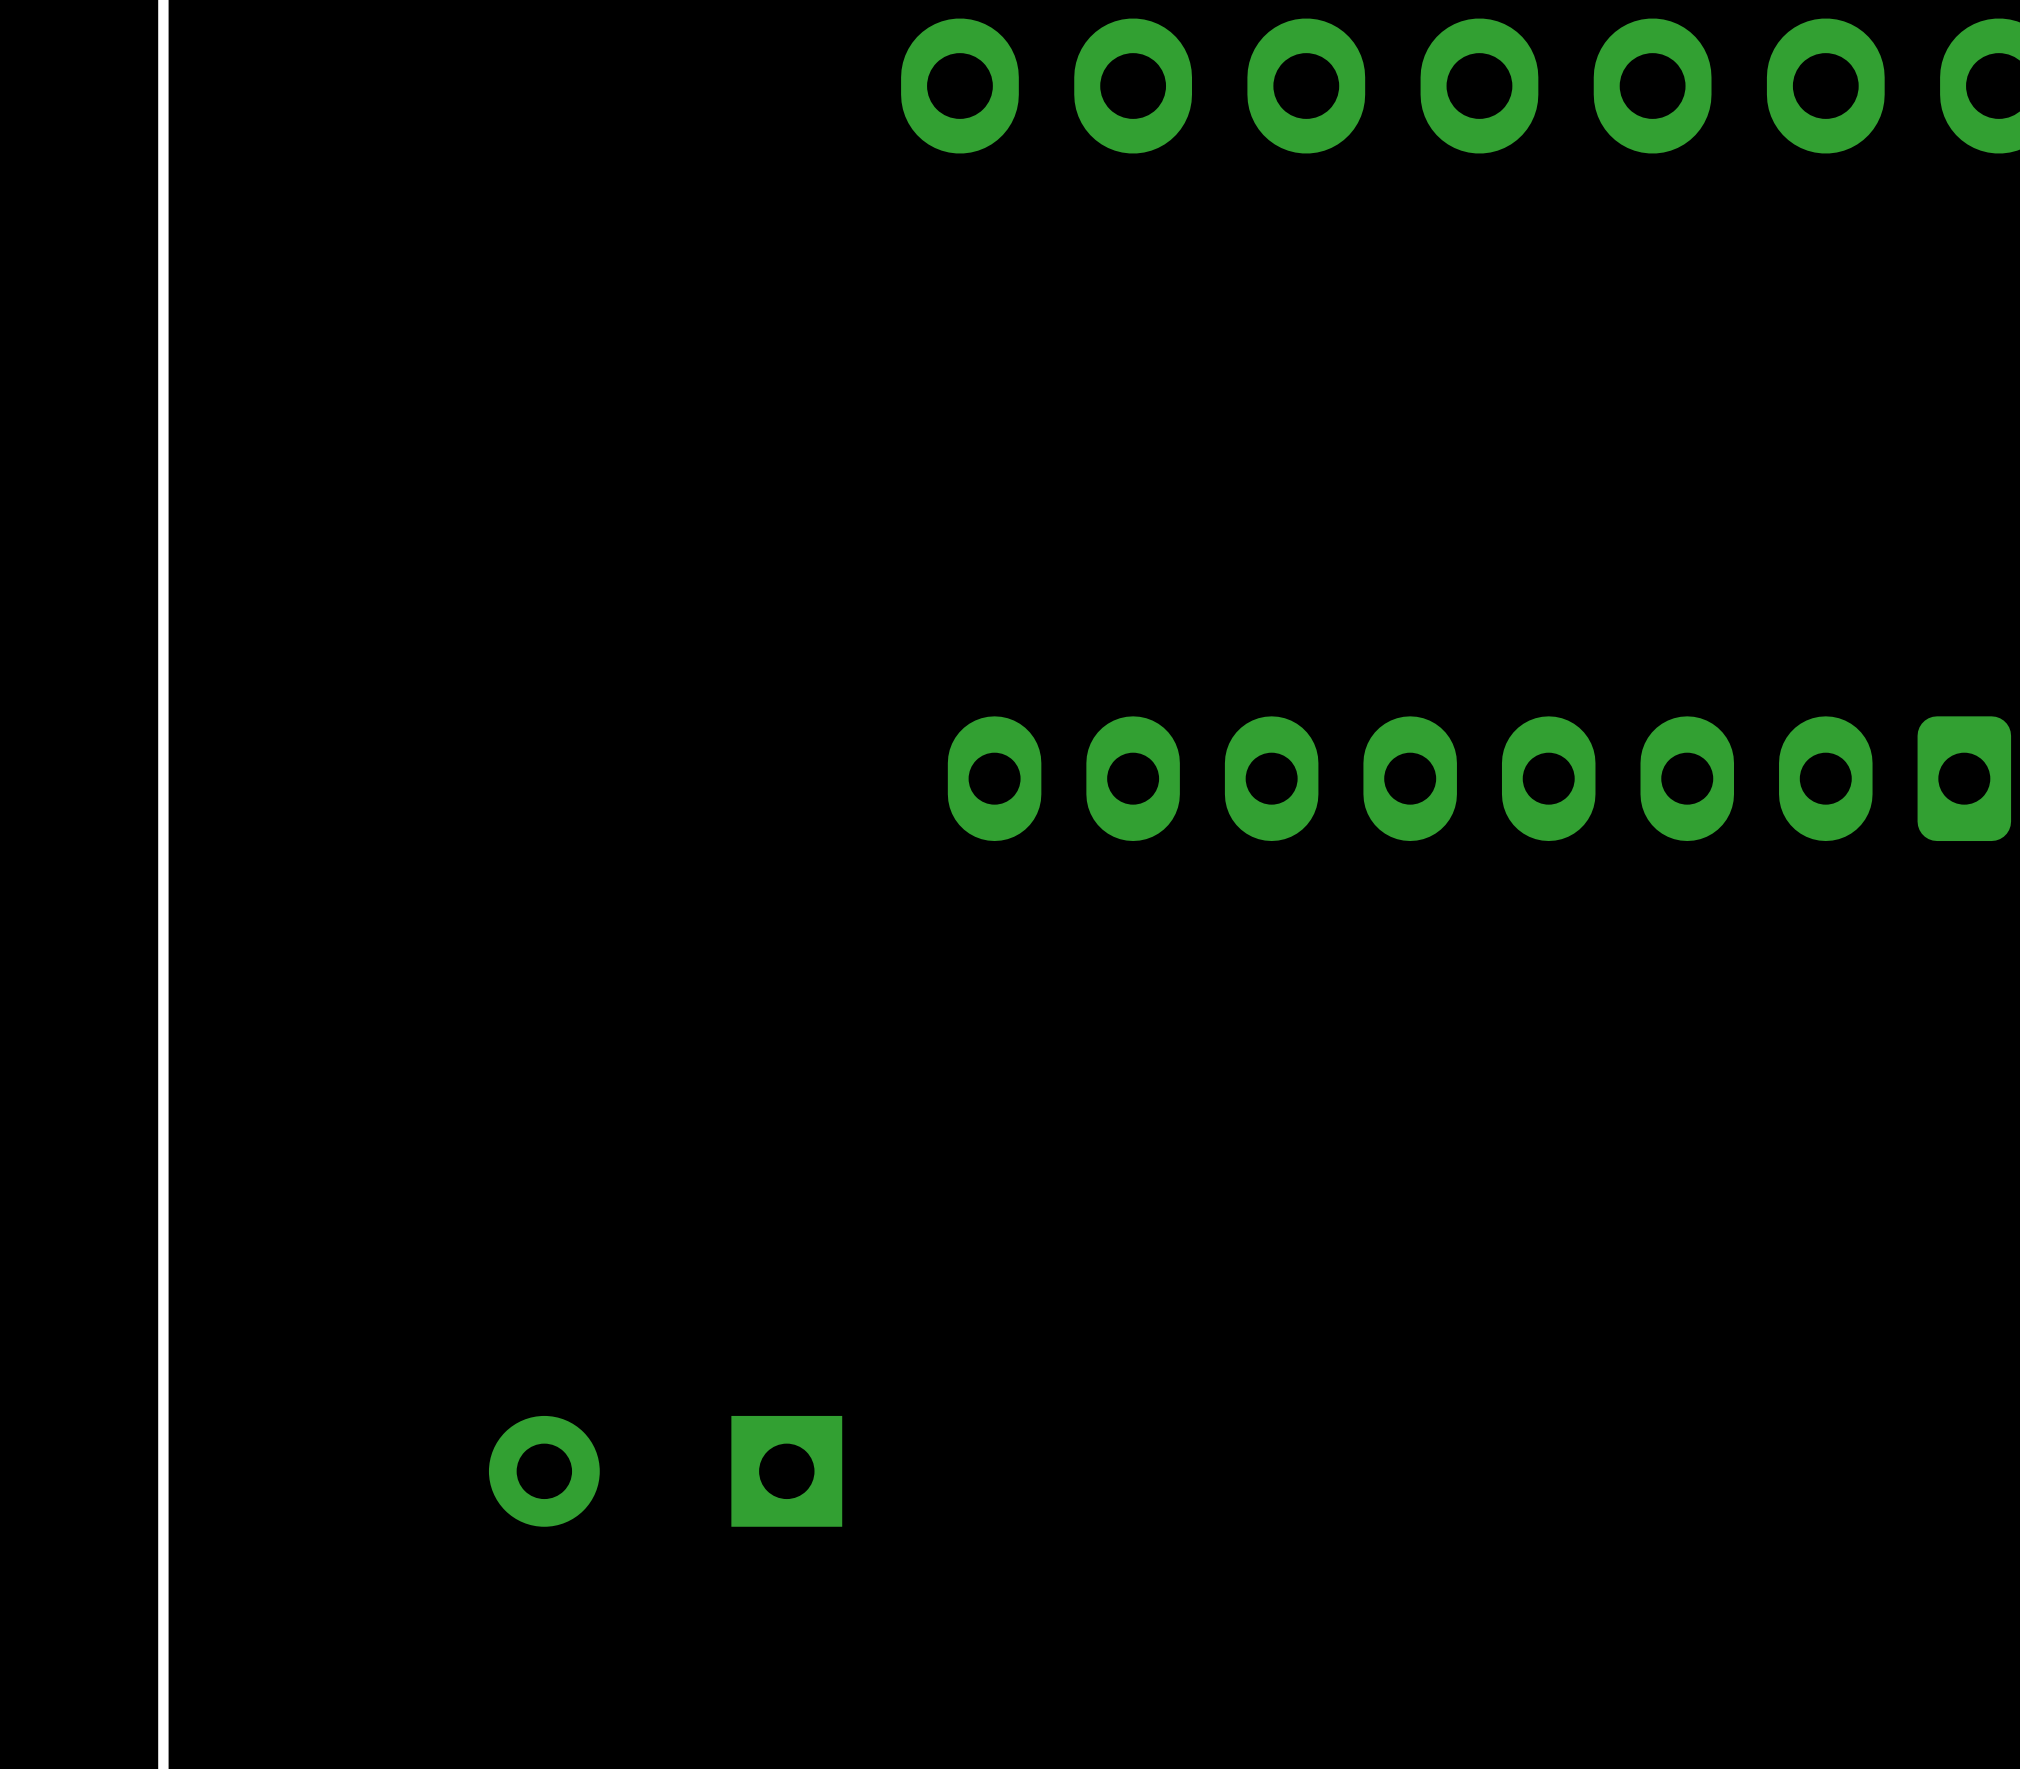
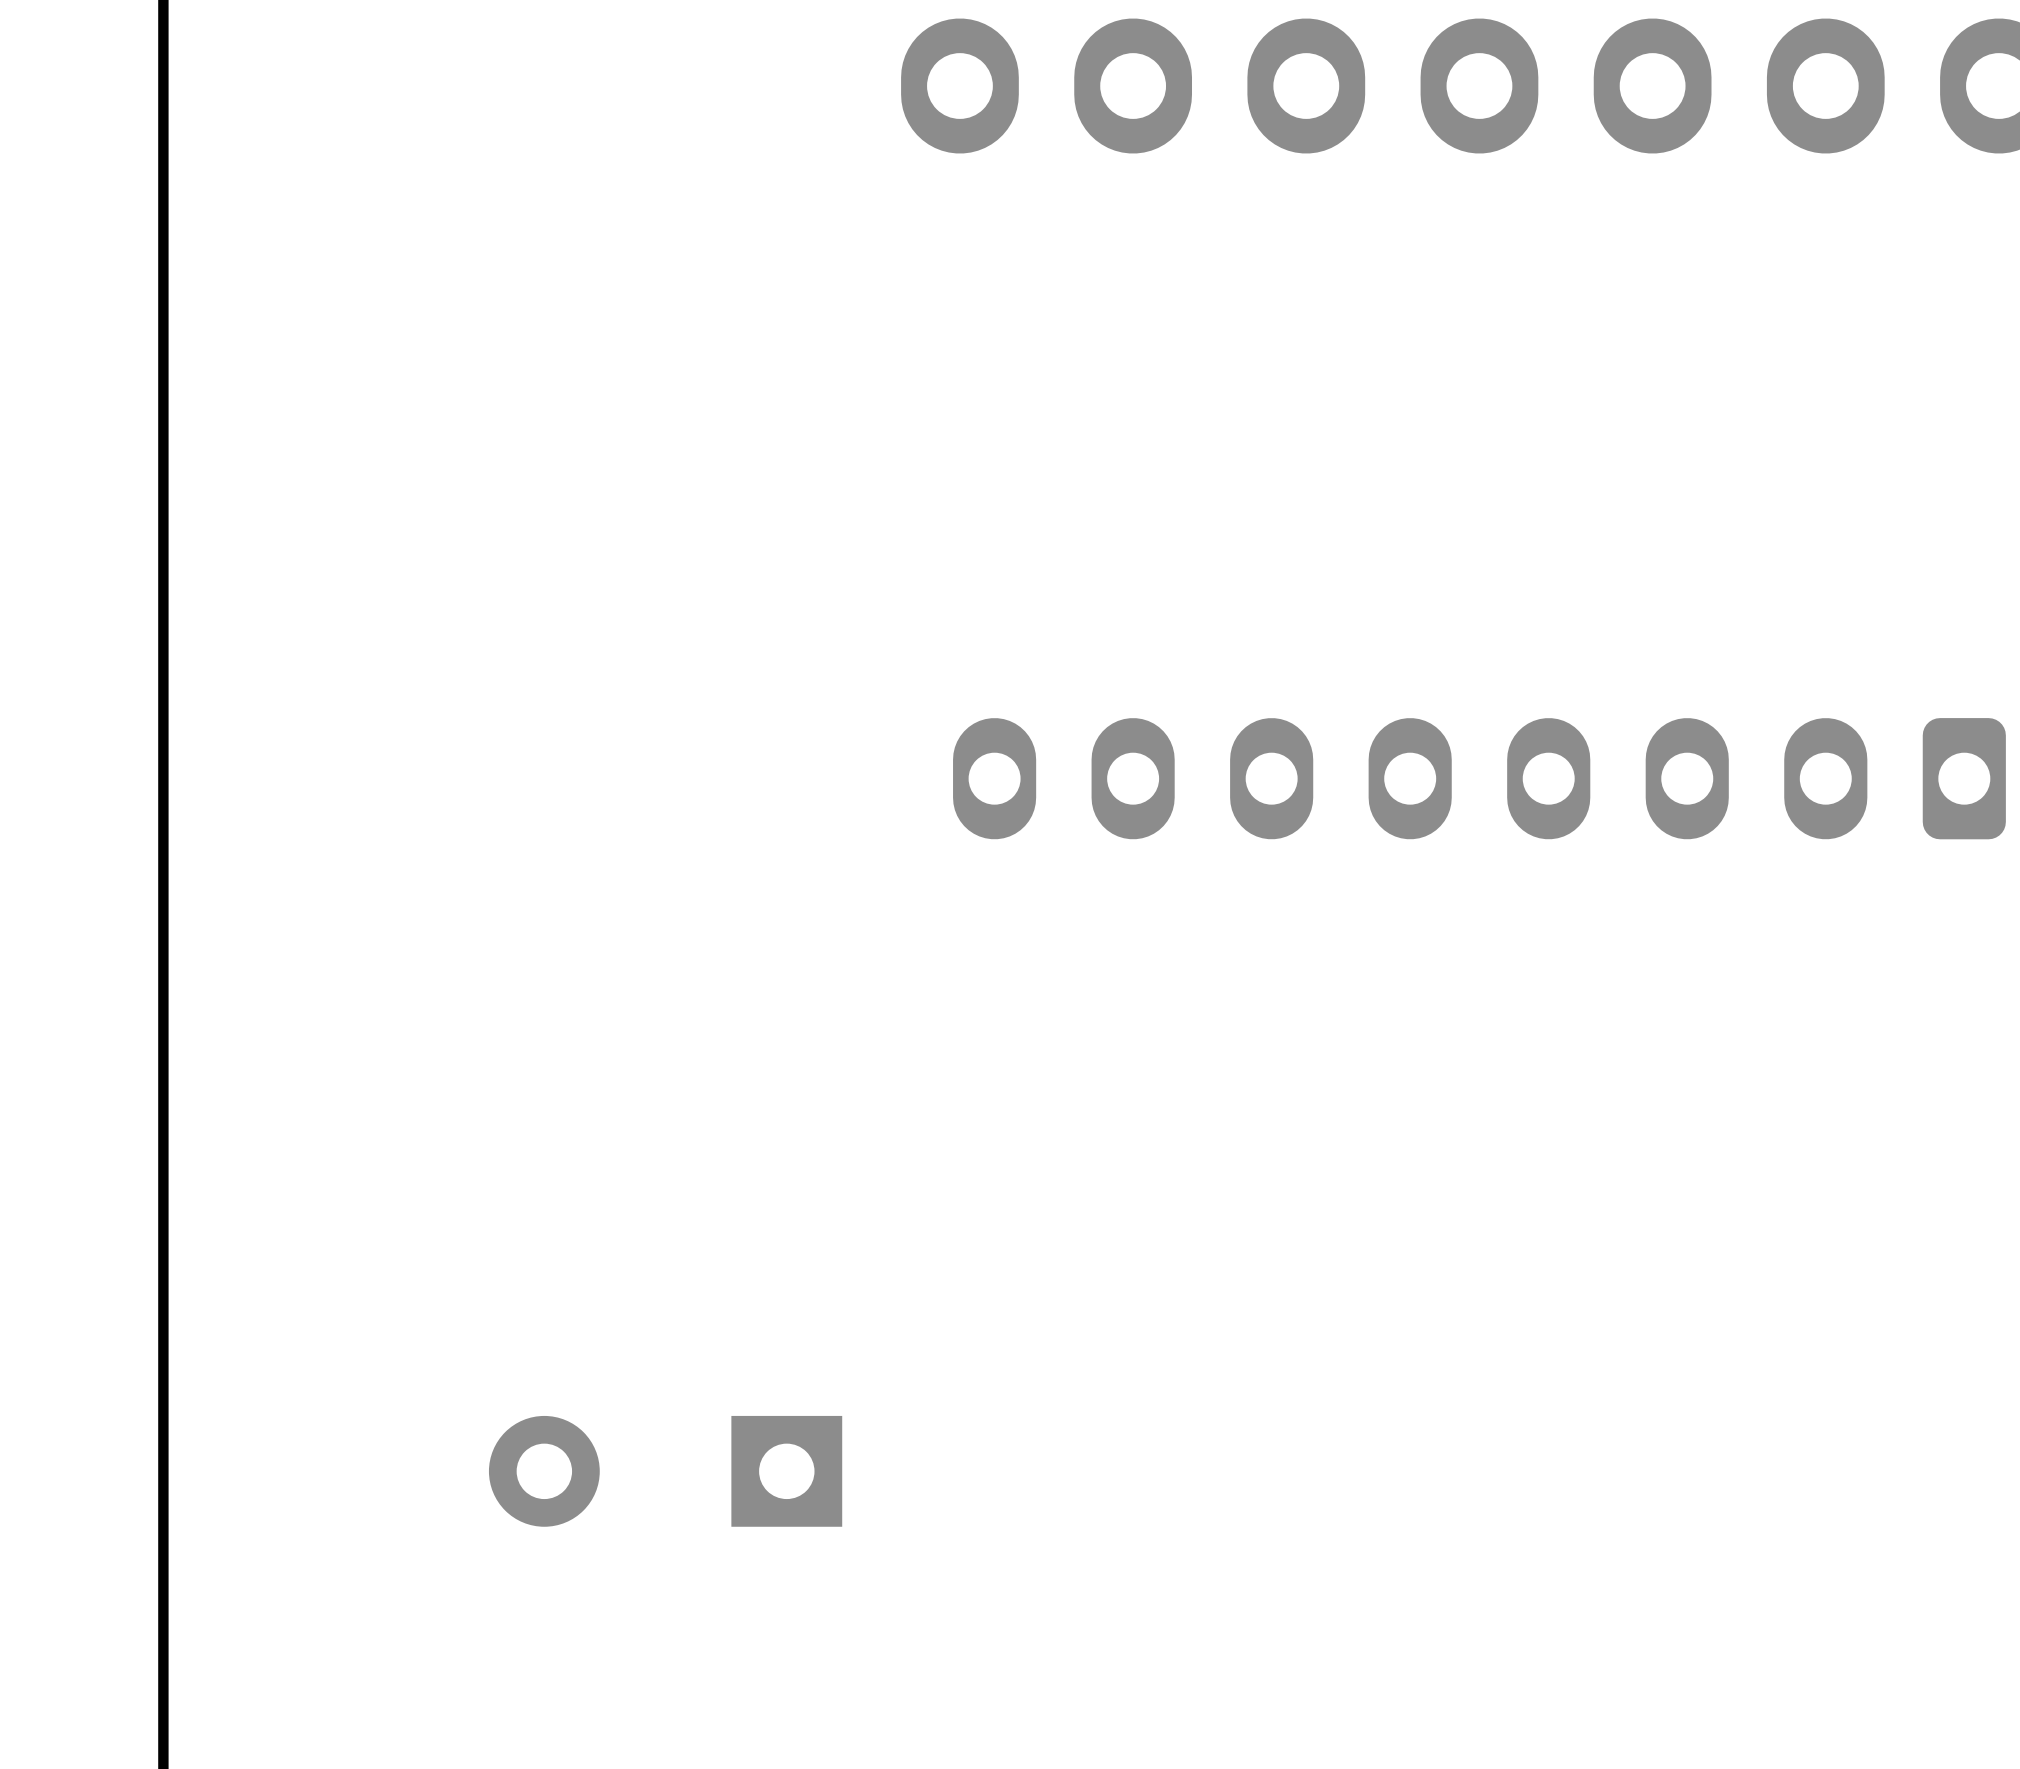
part footprint: [947, 716, 2012, 842] -> [953, 718, 2006, 840]

